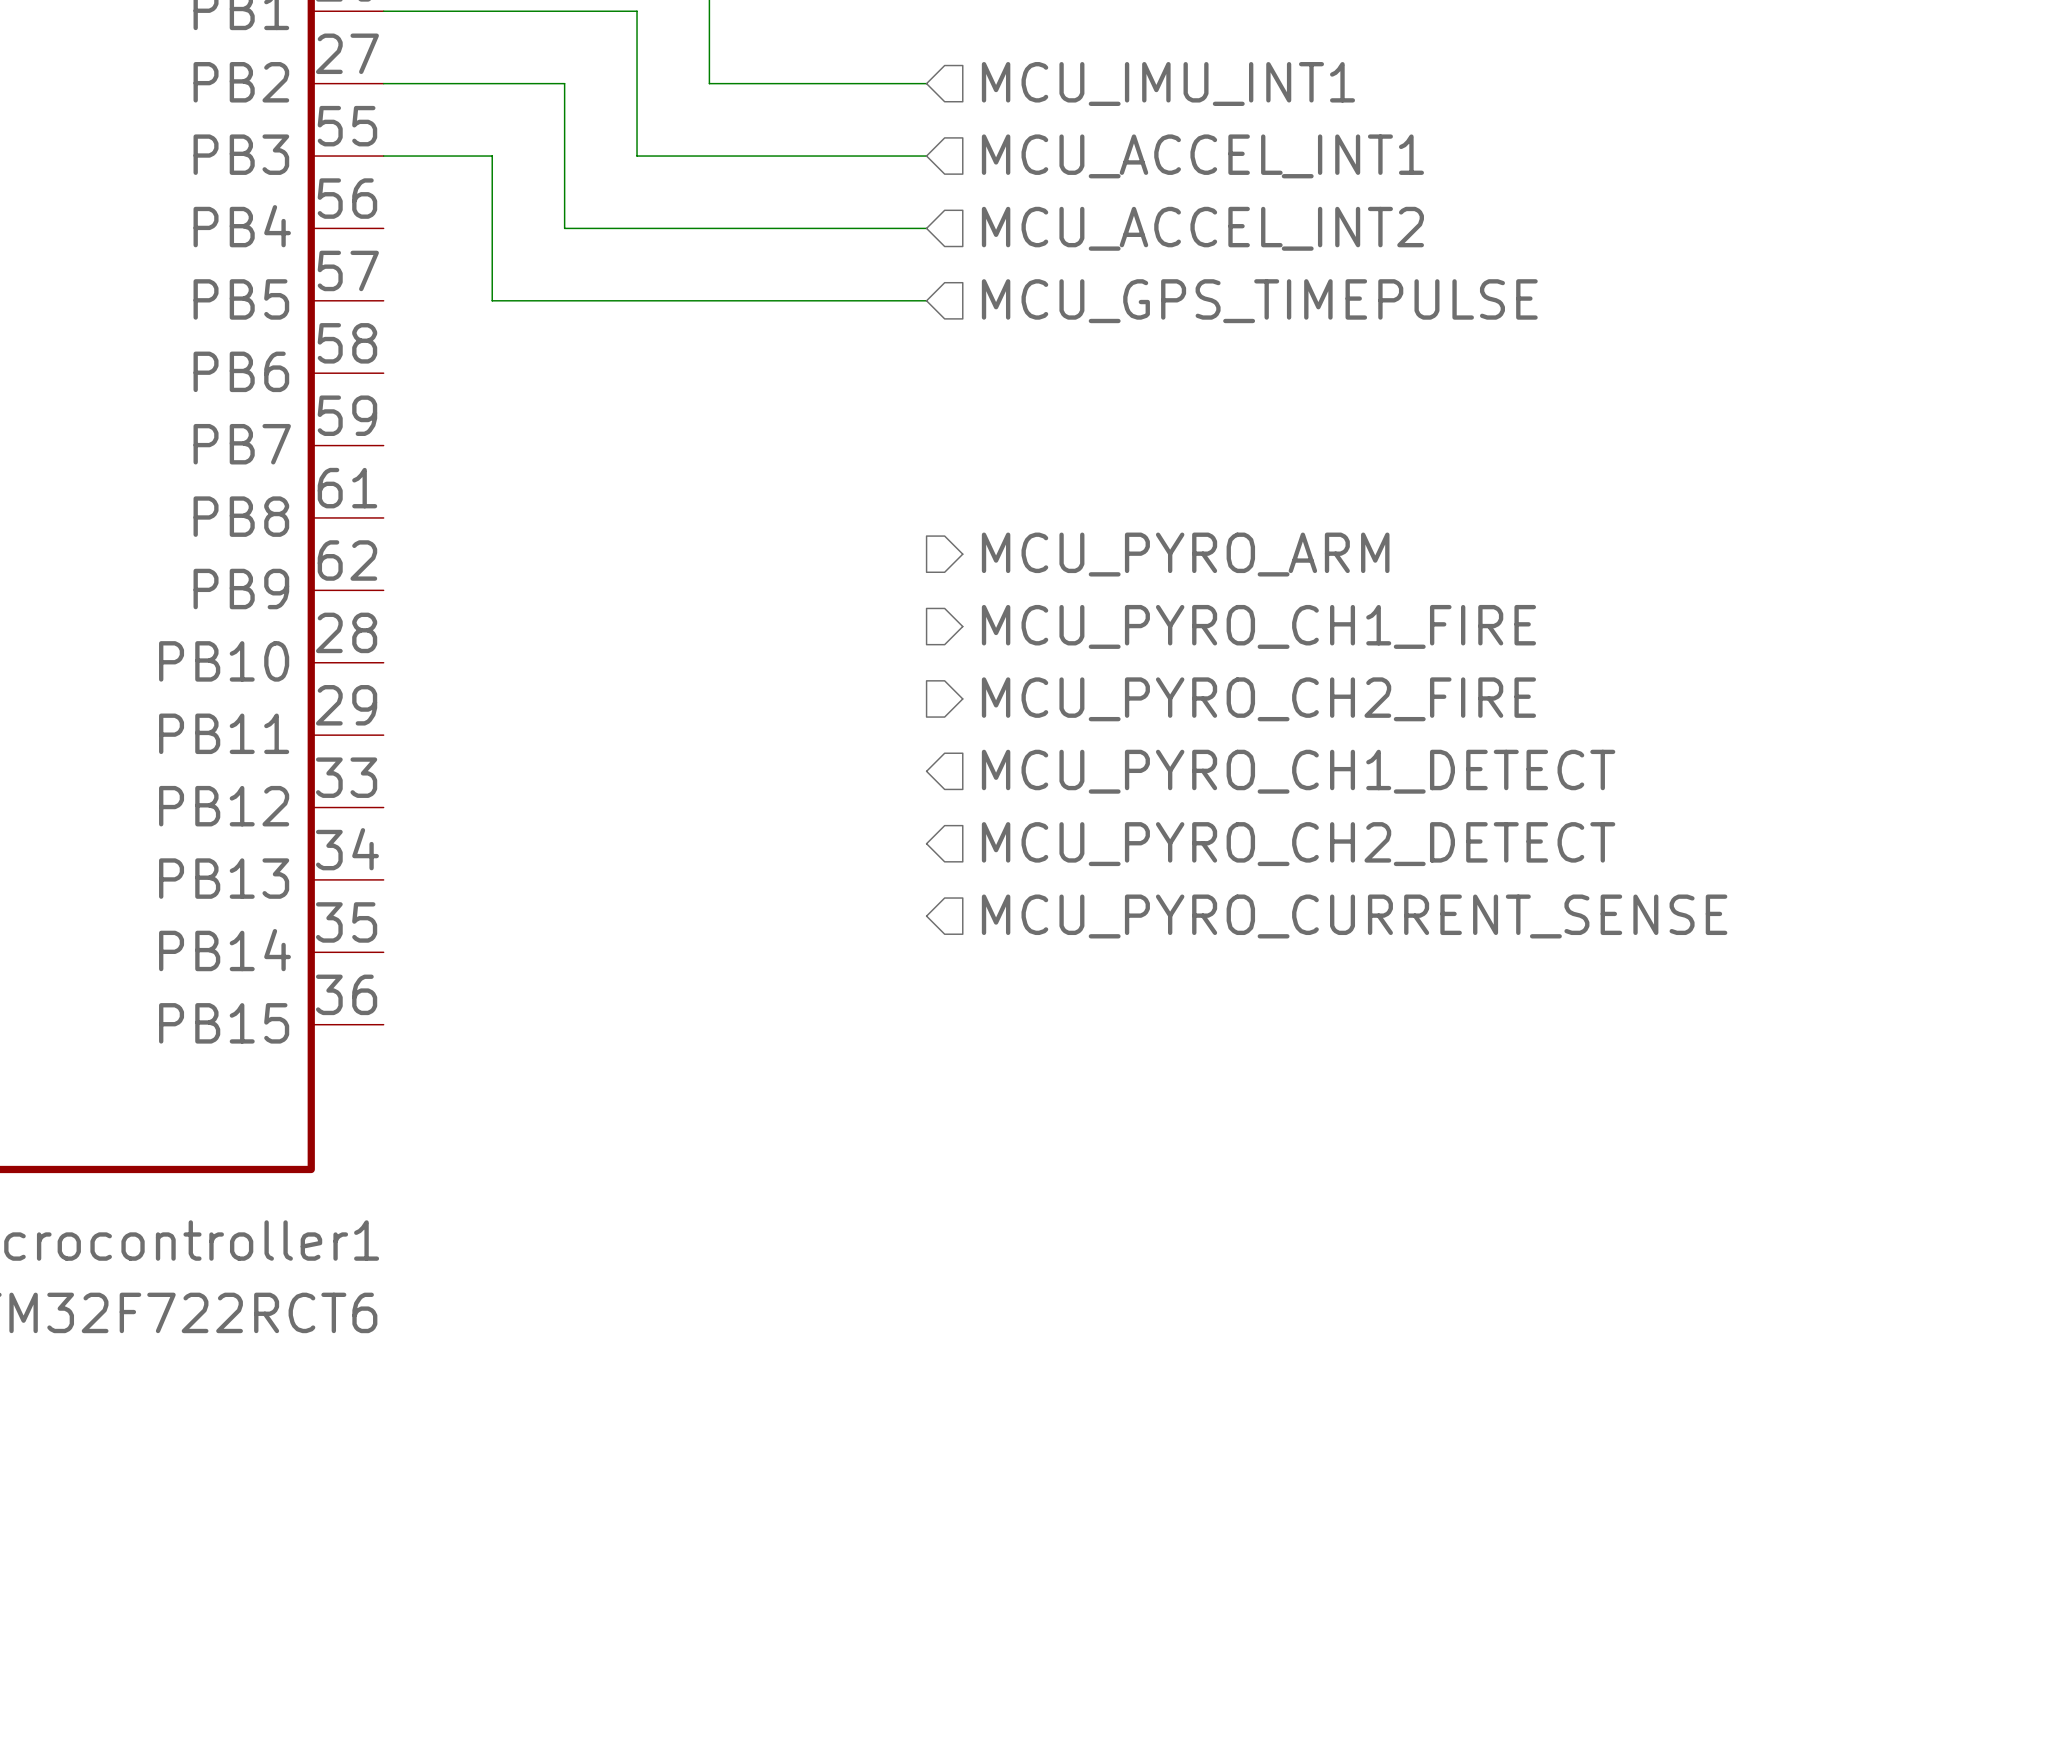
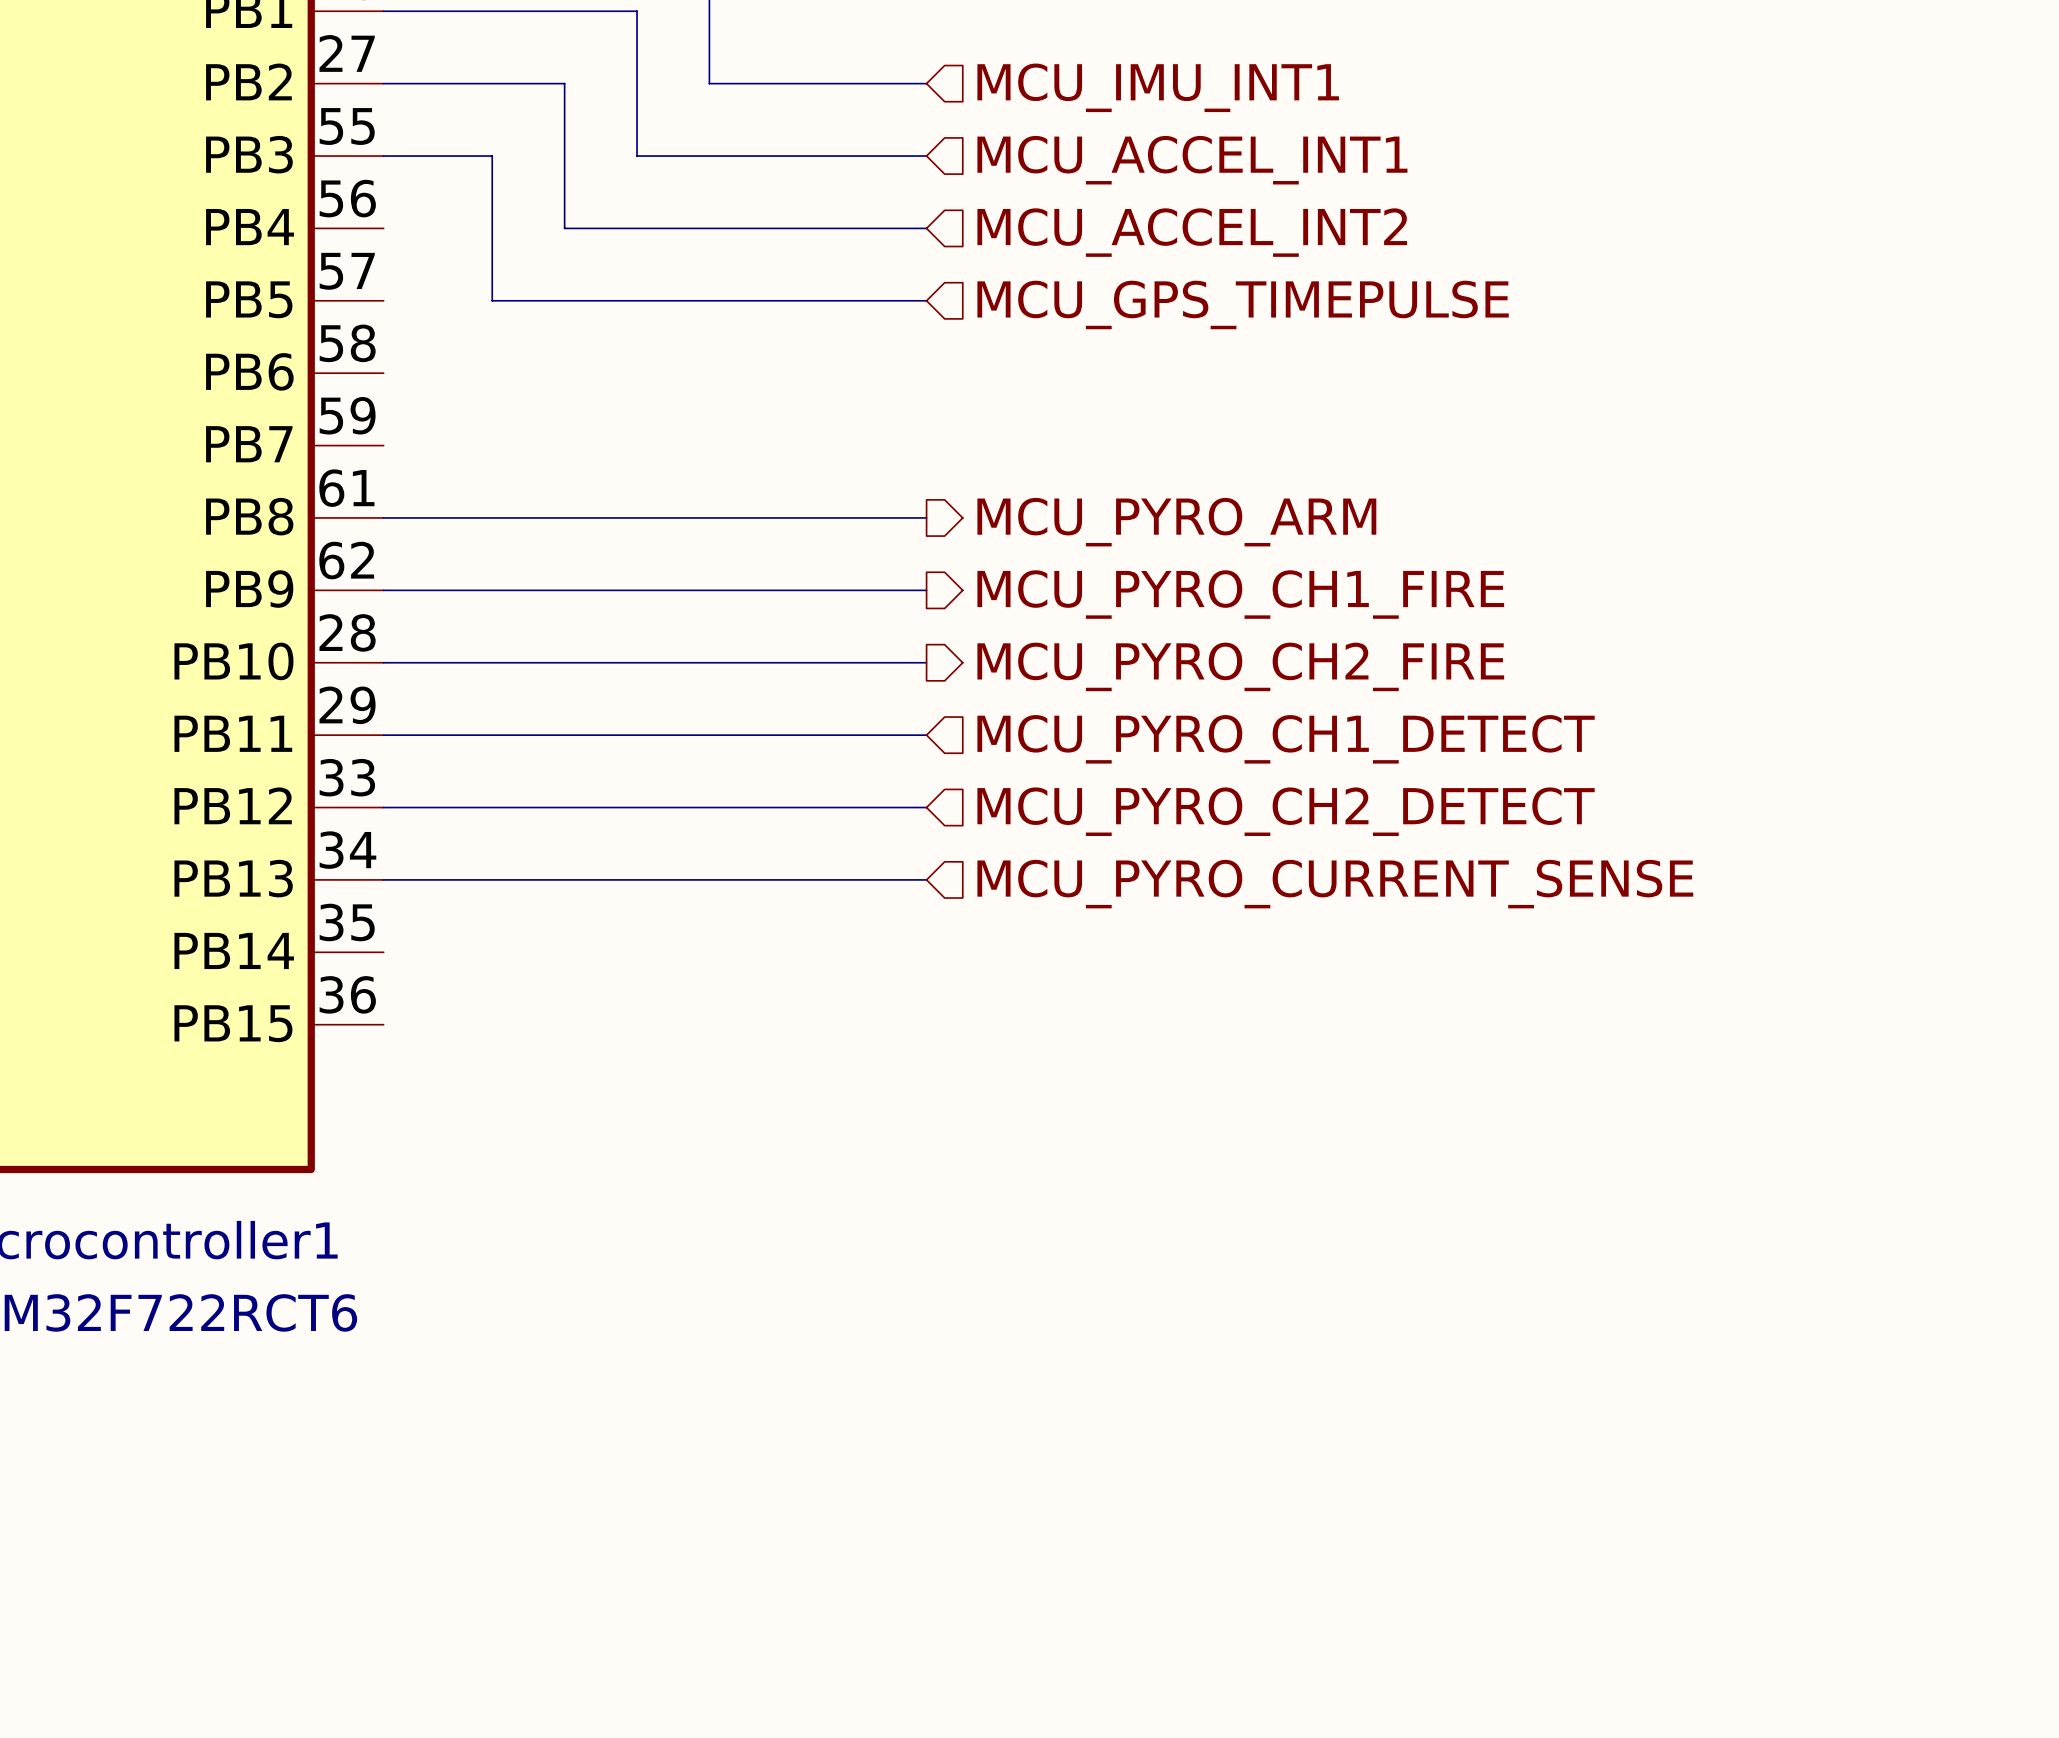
wire: none -> (383, 517) (926, 517)
hierarchical label position: MCU_PYRO_ARM (1185, 554) -> MCU_PYRO_ARM (1176, 522)
wire: none -> (383, 590) (926, 590)
hierarchical label position: MCU_PYRO_CH1_FIRE (1258, 626) -> MCU_PYRO_CH1_FIRE (1240, 594)
wire: none -> (383, 662) (926, 662)
hierarchical label position: MCU_PYRO_CH2_FIRE (1258, 699) -> MCU_PYRO_CH2_FIRE (1240, 666)
wire: none -> (383, 735) (926, 735)
hierarchical label position: MCU_PYRO_CH1_DETECT (1298, 771) -> MCU_PYRO_CH1_DETECT (1286, 739)
wire: none -> (383, 807) (926, 807)
hierarchical label position: MCU_PYRO_CH2_DETECT (1298, 844) -> MCU_PYRO_CH2_DETECT (1286, 811)
wire: none -> (383, 879) (926, 879)
hierarchical label position: MCU_PYRO_CURRENT_SENSE (1354, 916) -> MCU_PYRO_CURRENT_SENSE (1335, 884)

